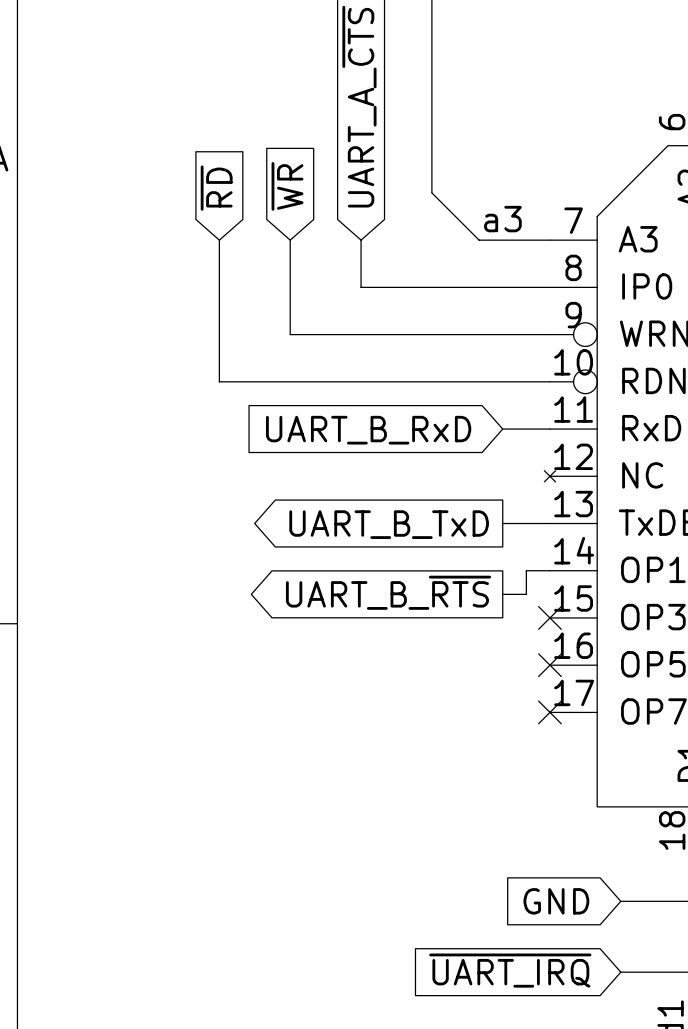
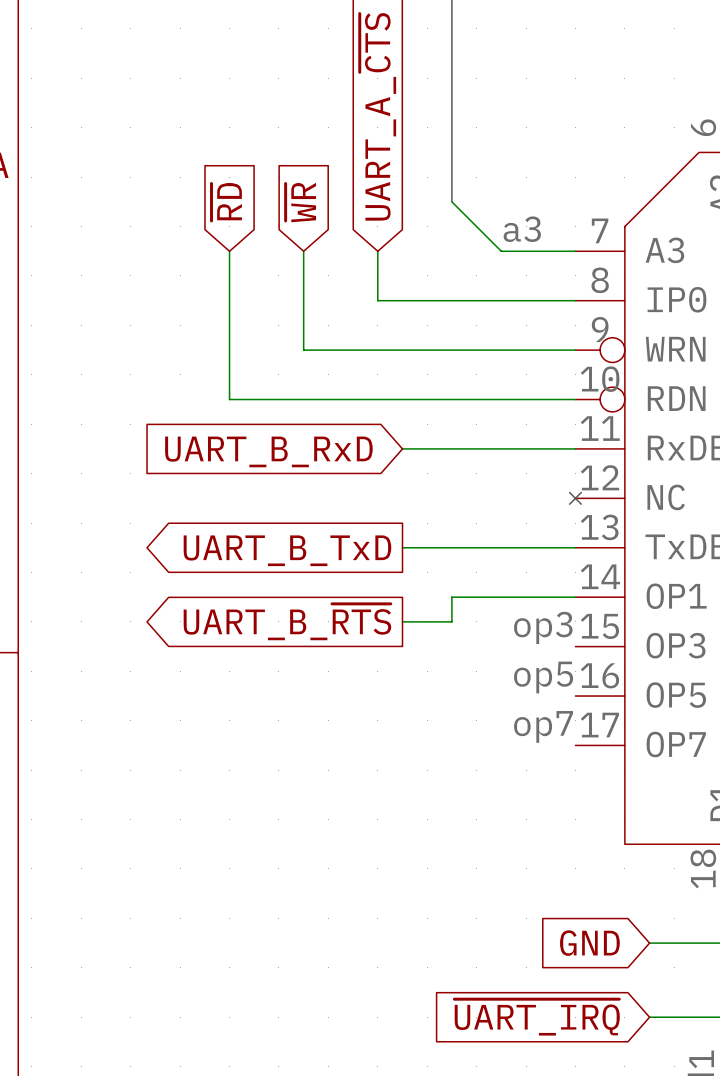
wire: none -> (402, 448) (526, 448)
global label position: UART_B_RxD (368, 430) -> UART_B_RxD (268, 451)
wire: none -> (402, 547) (526, 547)
global label position: UART_B_TxD (389, 524) -> UART_B_TxD (287, 550)
wire: (526, 570) (526, 594) (502, 594) -> (550, 597) (451, 597) (451, 621) (402, 621)
global label position: UART_B_~{RTS} (388, 592) -> UART_B_~{RTS} (287, 622)
label: none -> op3 (543, 627)
no-connect mark: (549, 617) -> none
label: none -> op5 (543, 677)
no-connect mark: (549, 665) -> none
label: none -> op7 (543, 726)
no-connect mark: (549, 712) -> none

